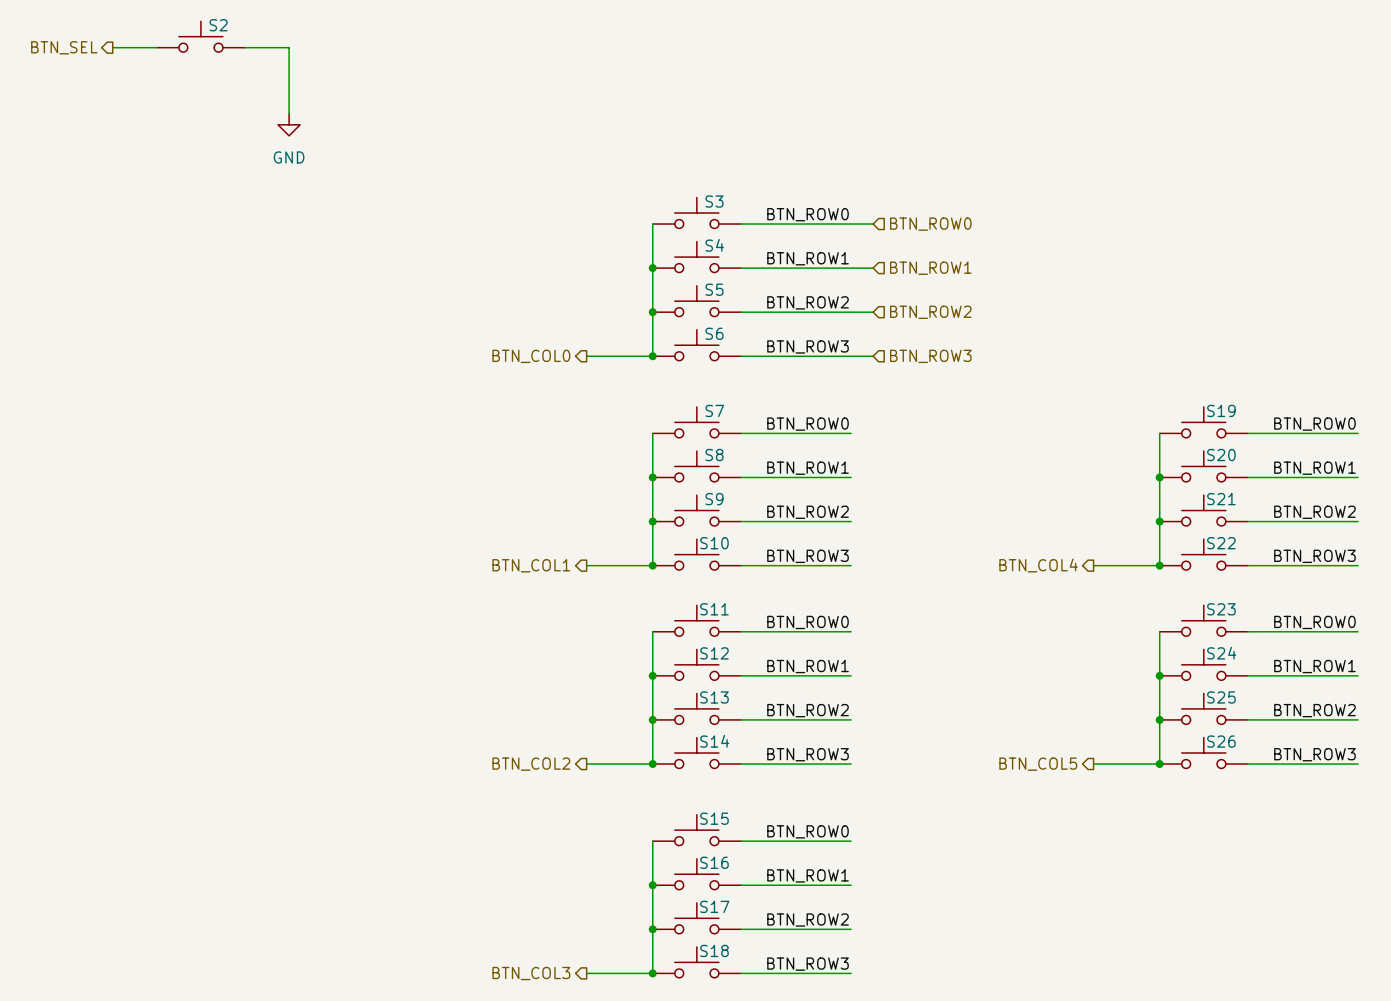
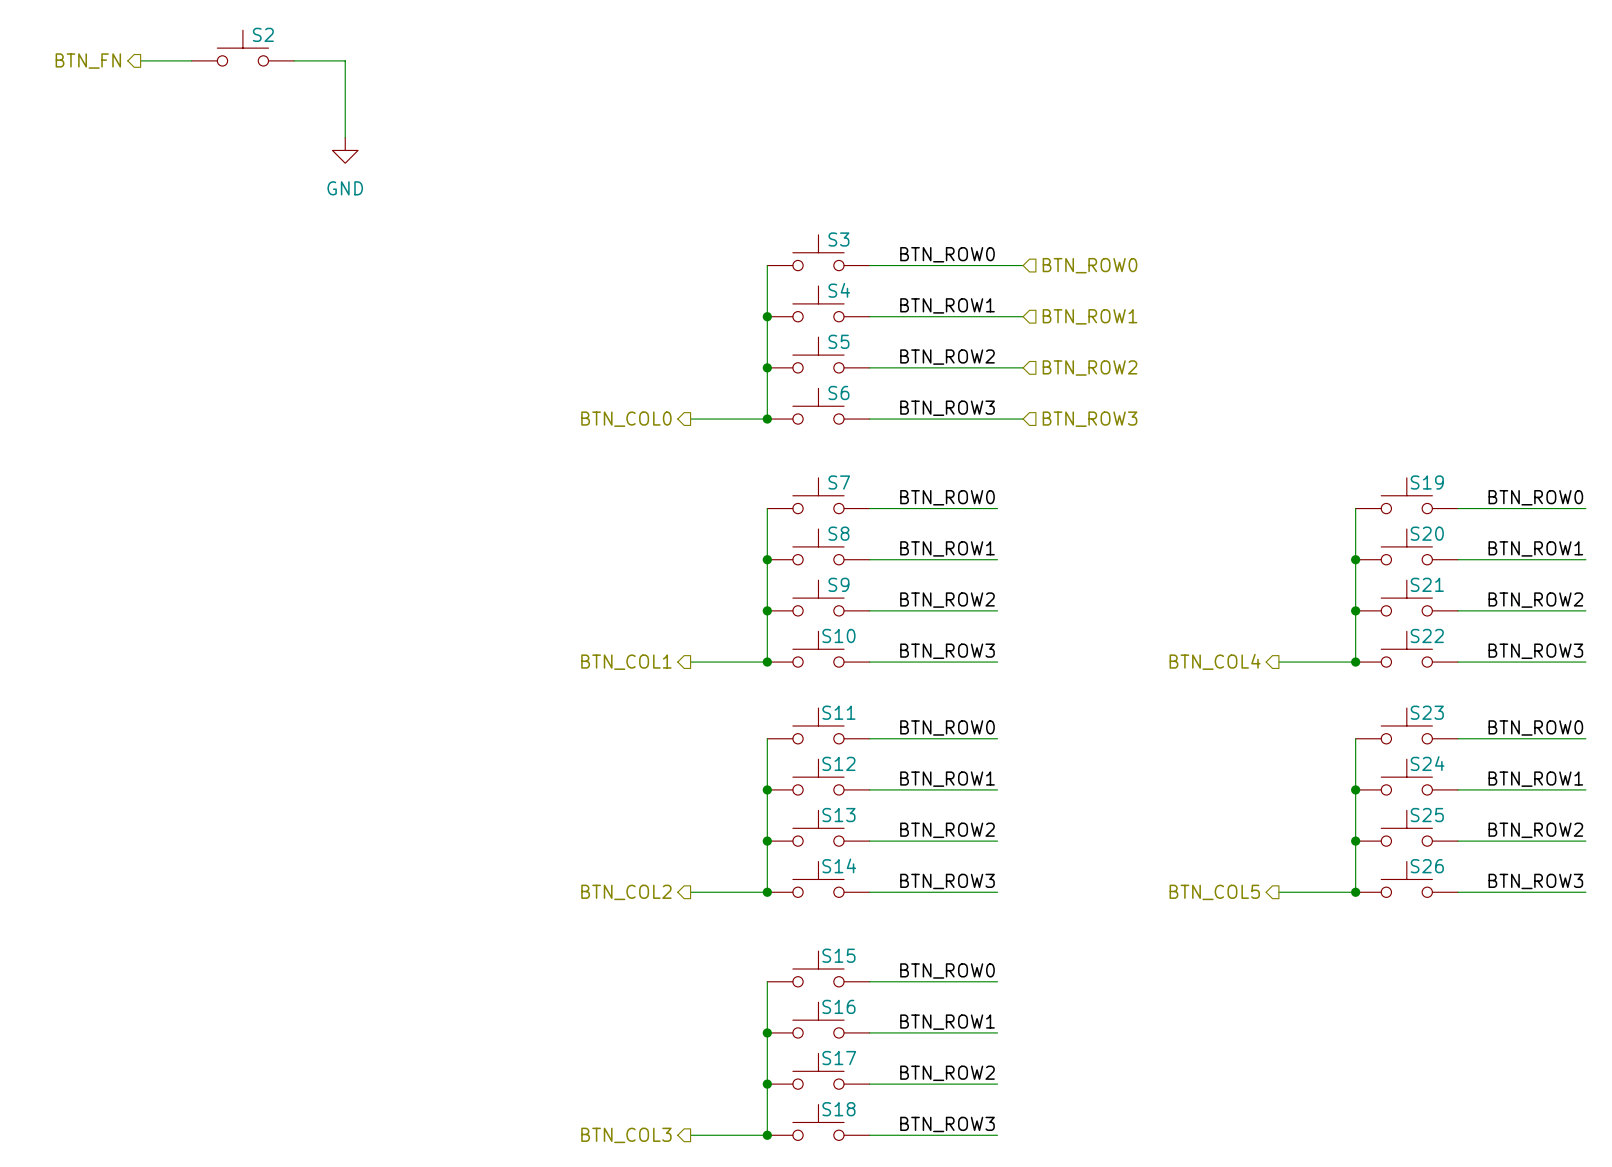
hierarchical label: BTN_SEL (64, 47) -> BTN_FN (88, 61)

